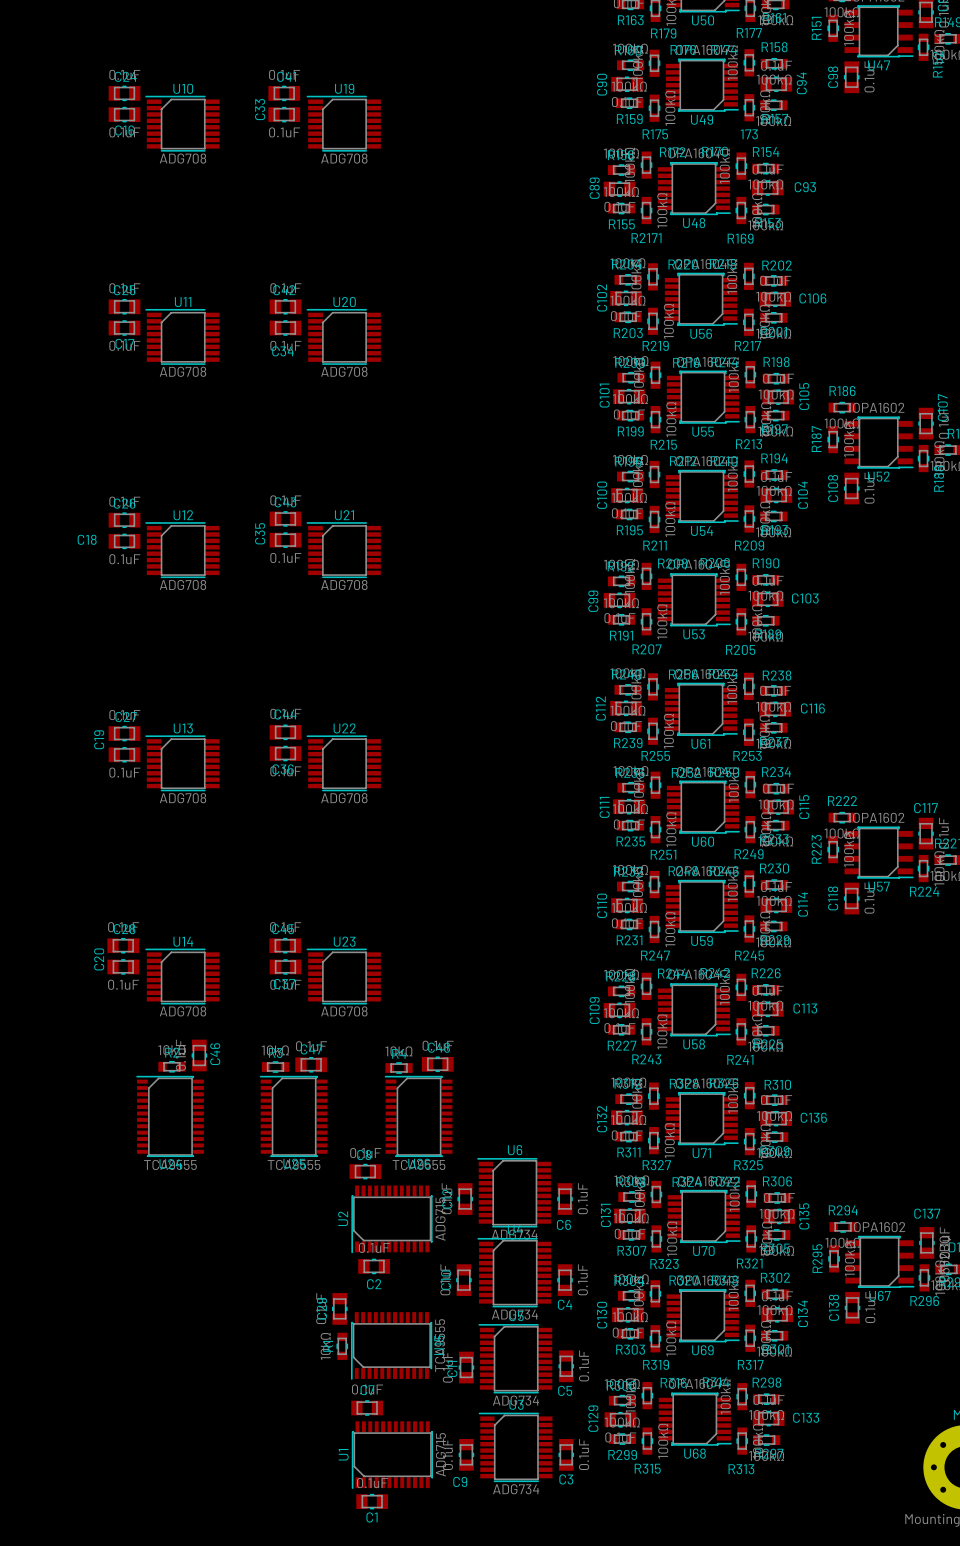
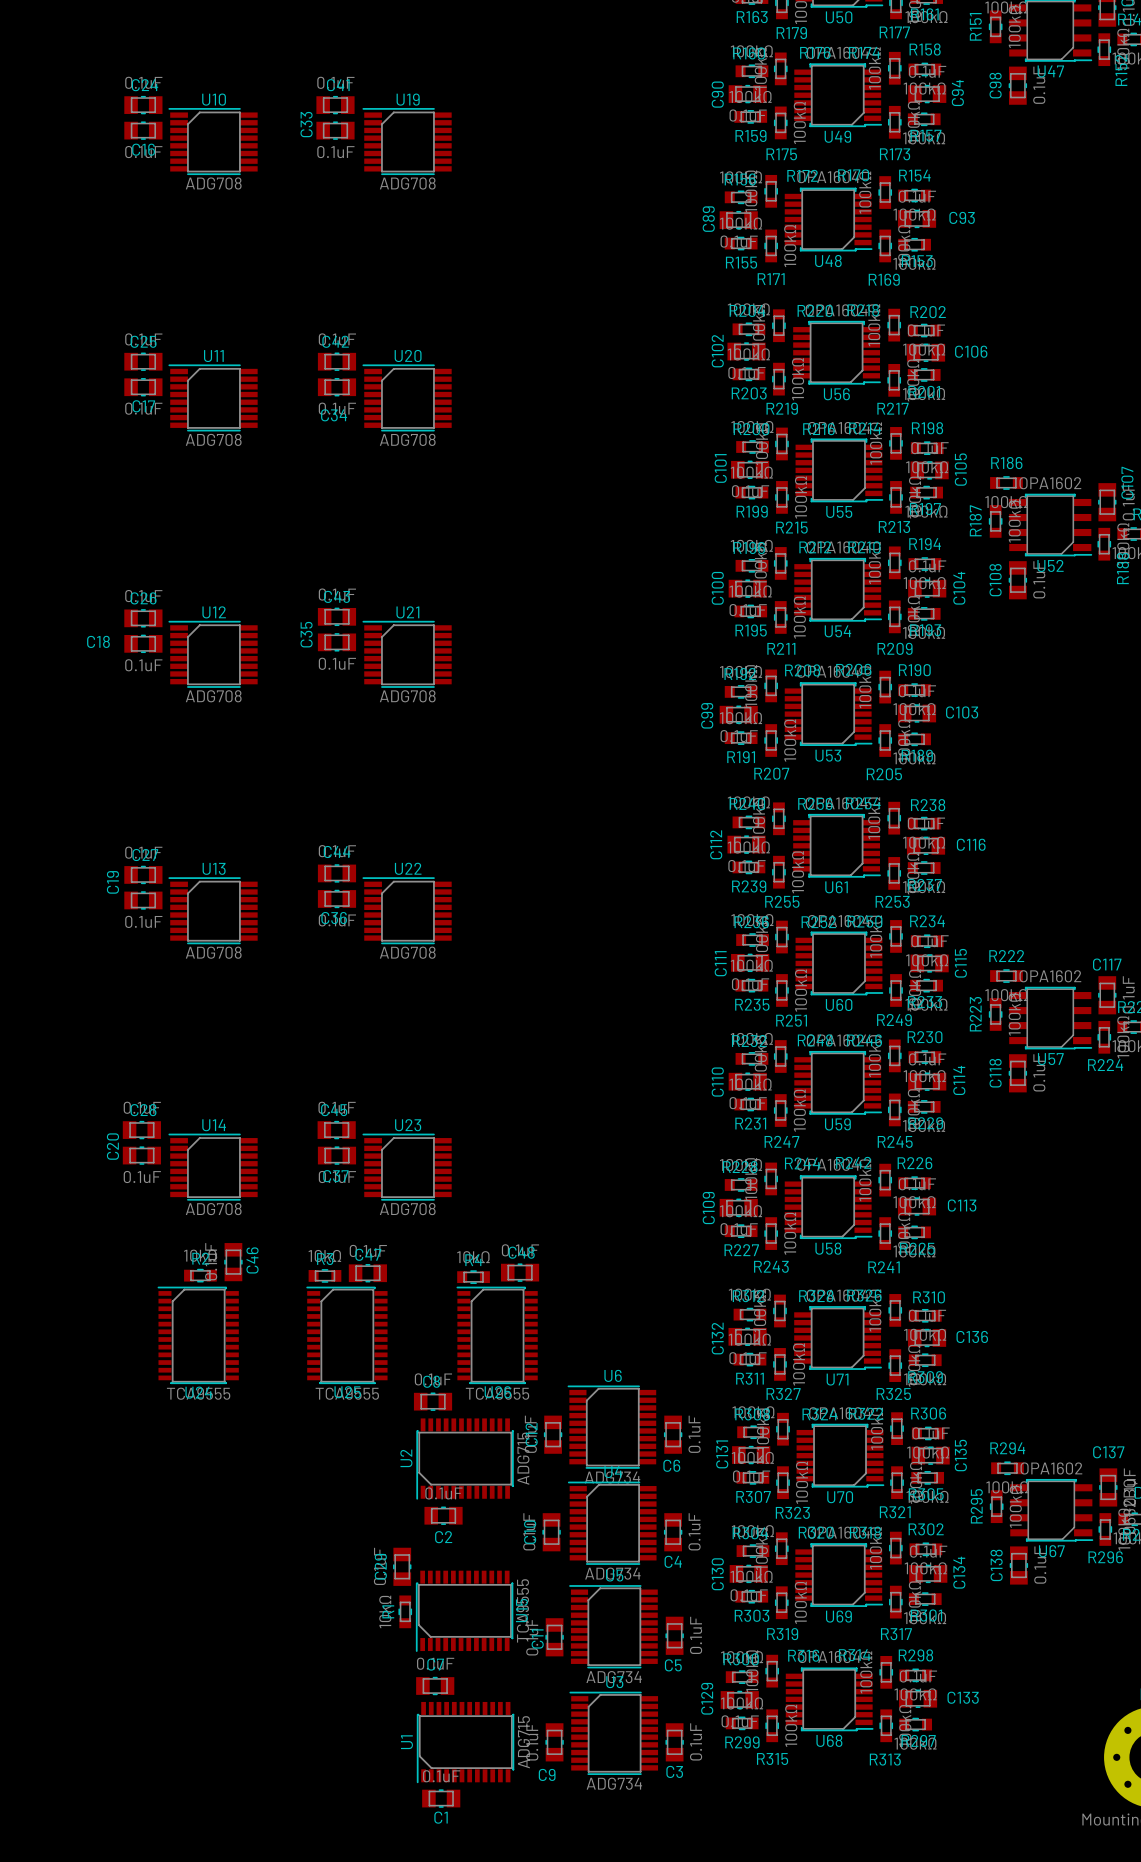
173 name: 173 (749, 134) -> R173 (895, 154)
R2171 name: R2171 (646, 238) -> R171 (771, 279)

